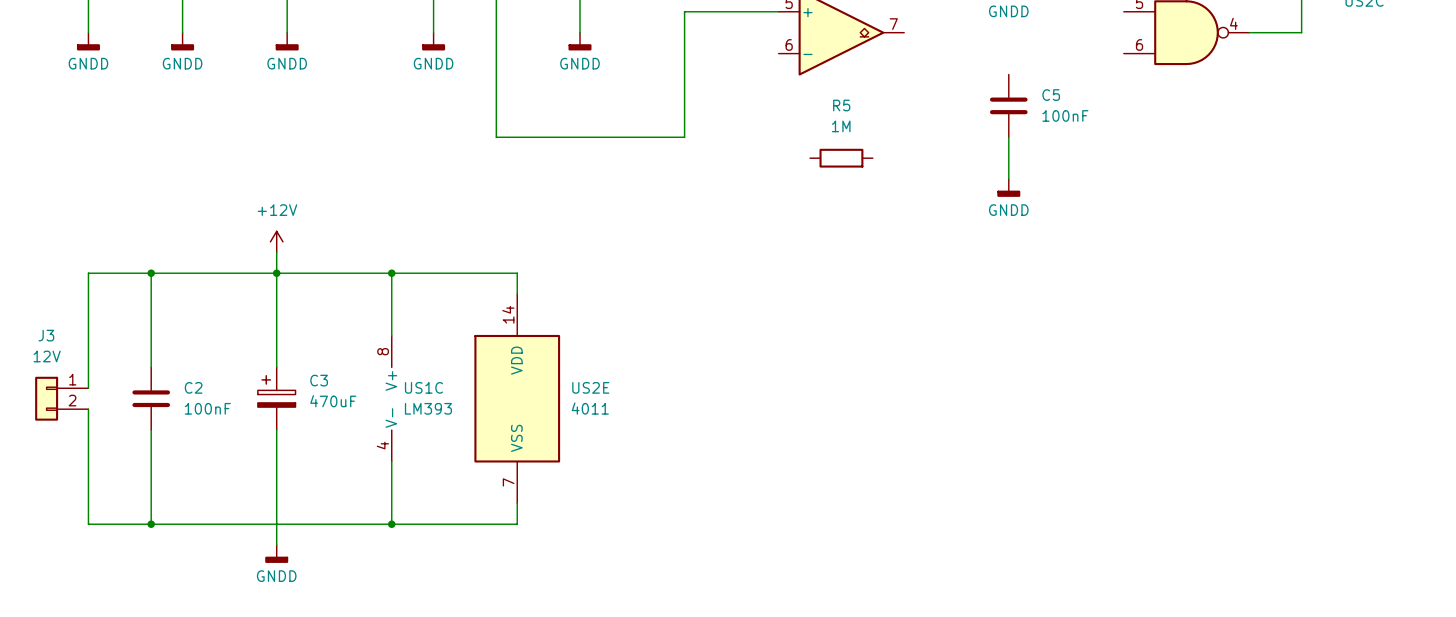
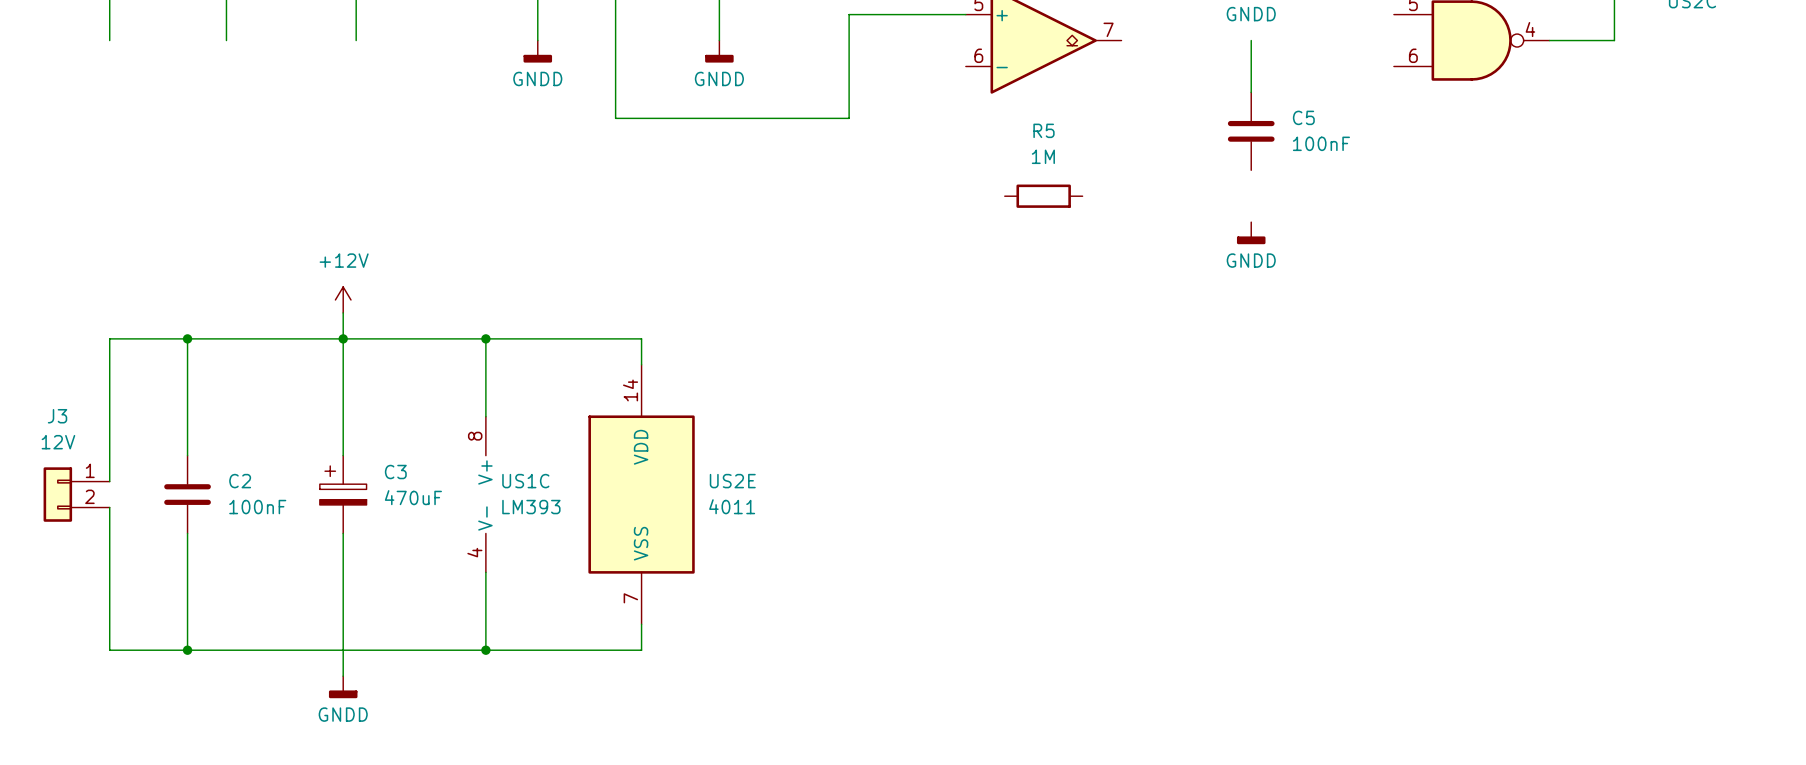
power symbol: GNDD (88, 41) -> none
power symbol: GNDD (182, 41) -> none
power symbol: GNDD (287, 41) -> none
wire: (496, 95) (496, 137) (684, 137) (684, 95) -> (615, 118) (849, 118)
wire: (1008, 137) (1008, 179) -> (1251, 40) (1251, 92)

